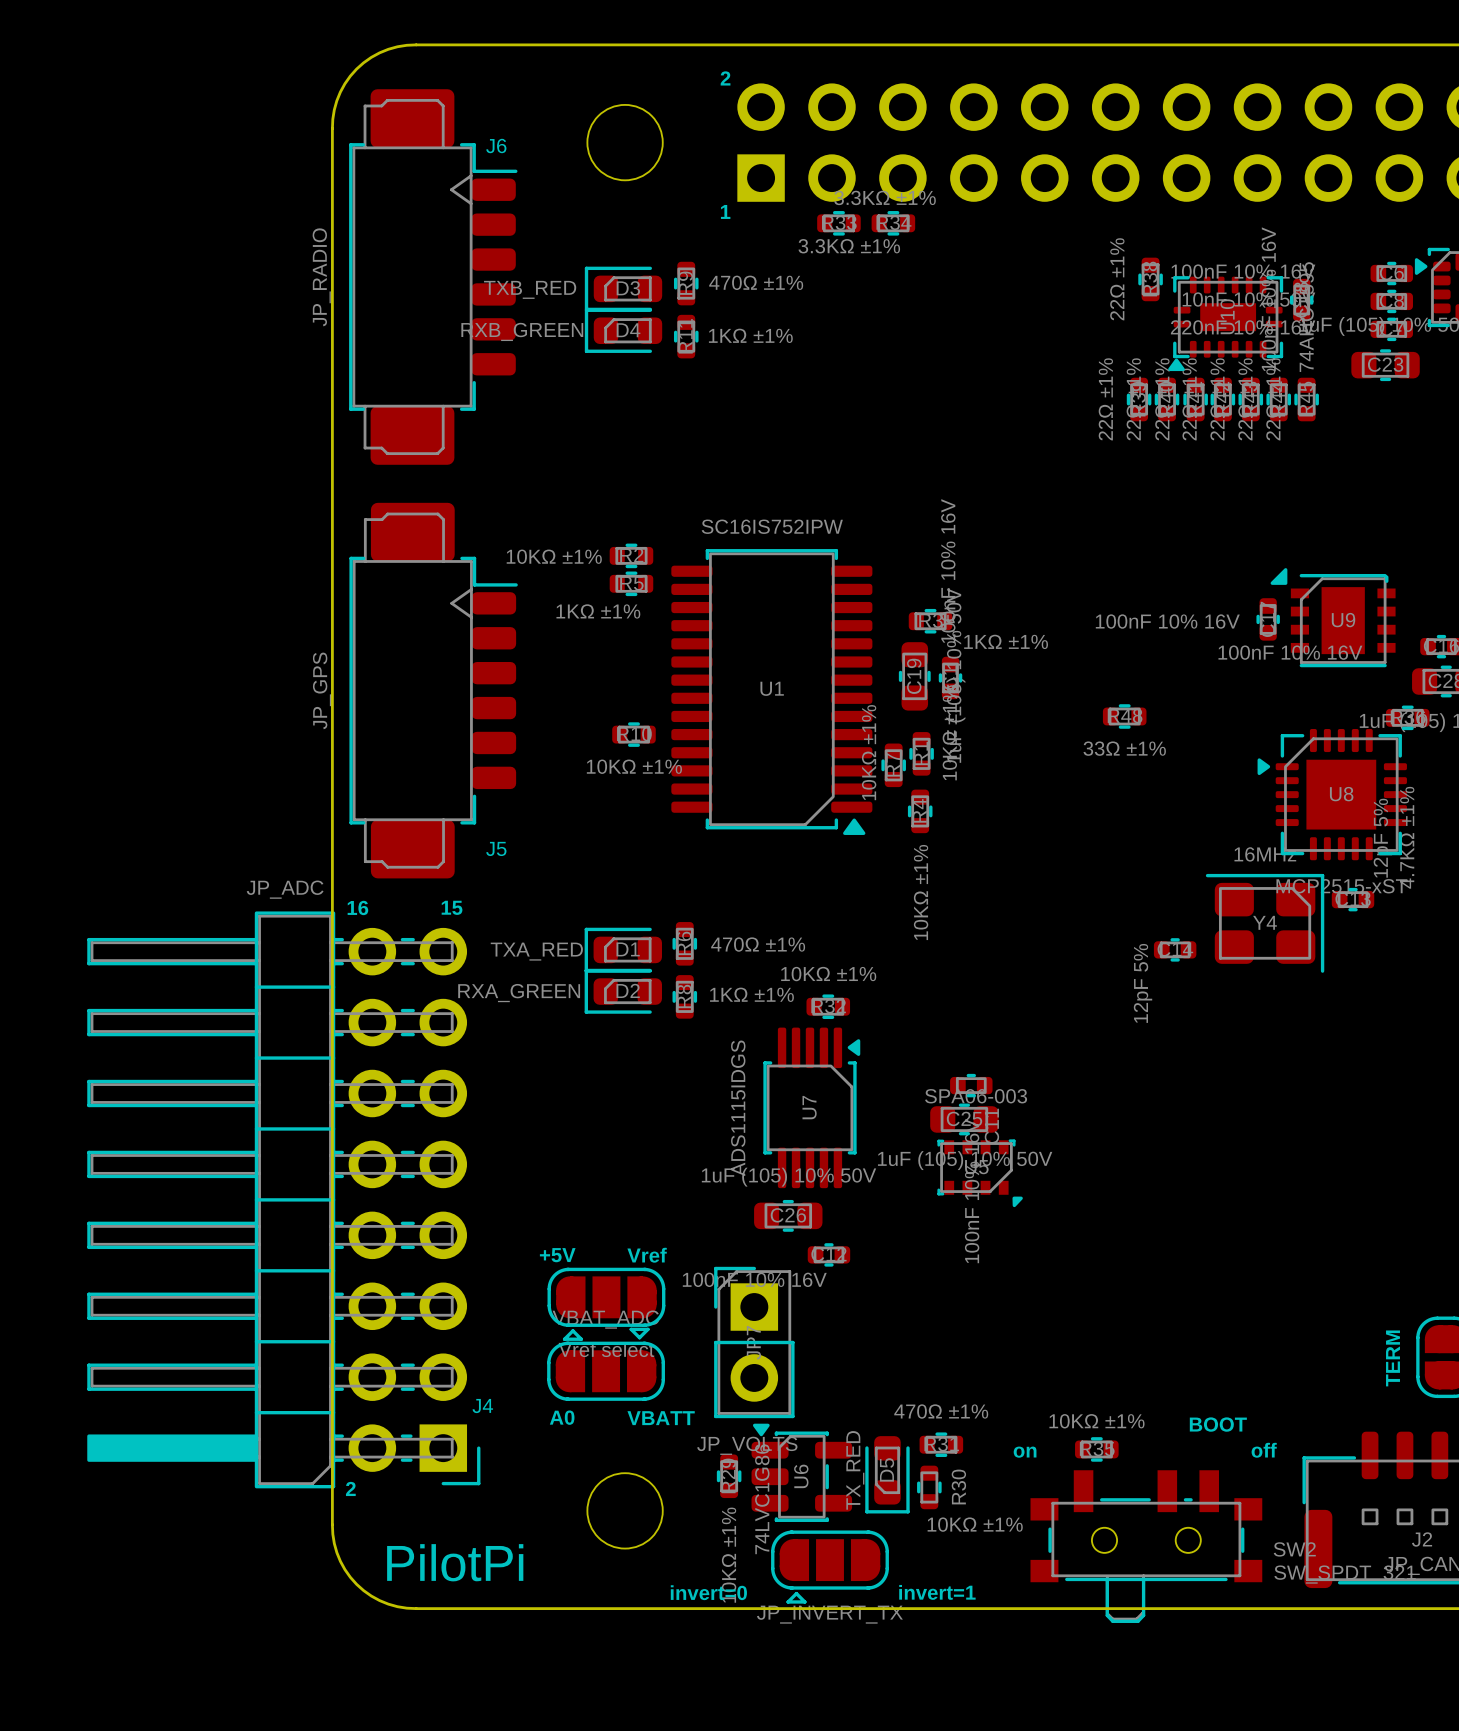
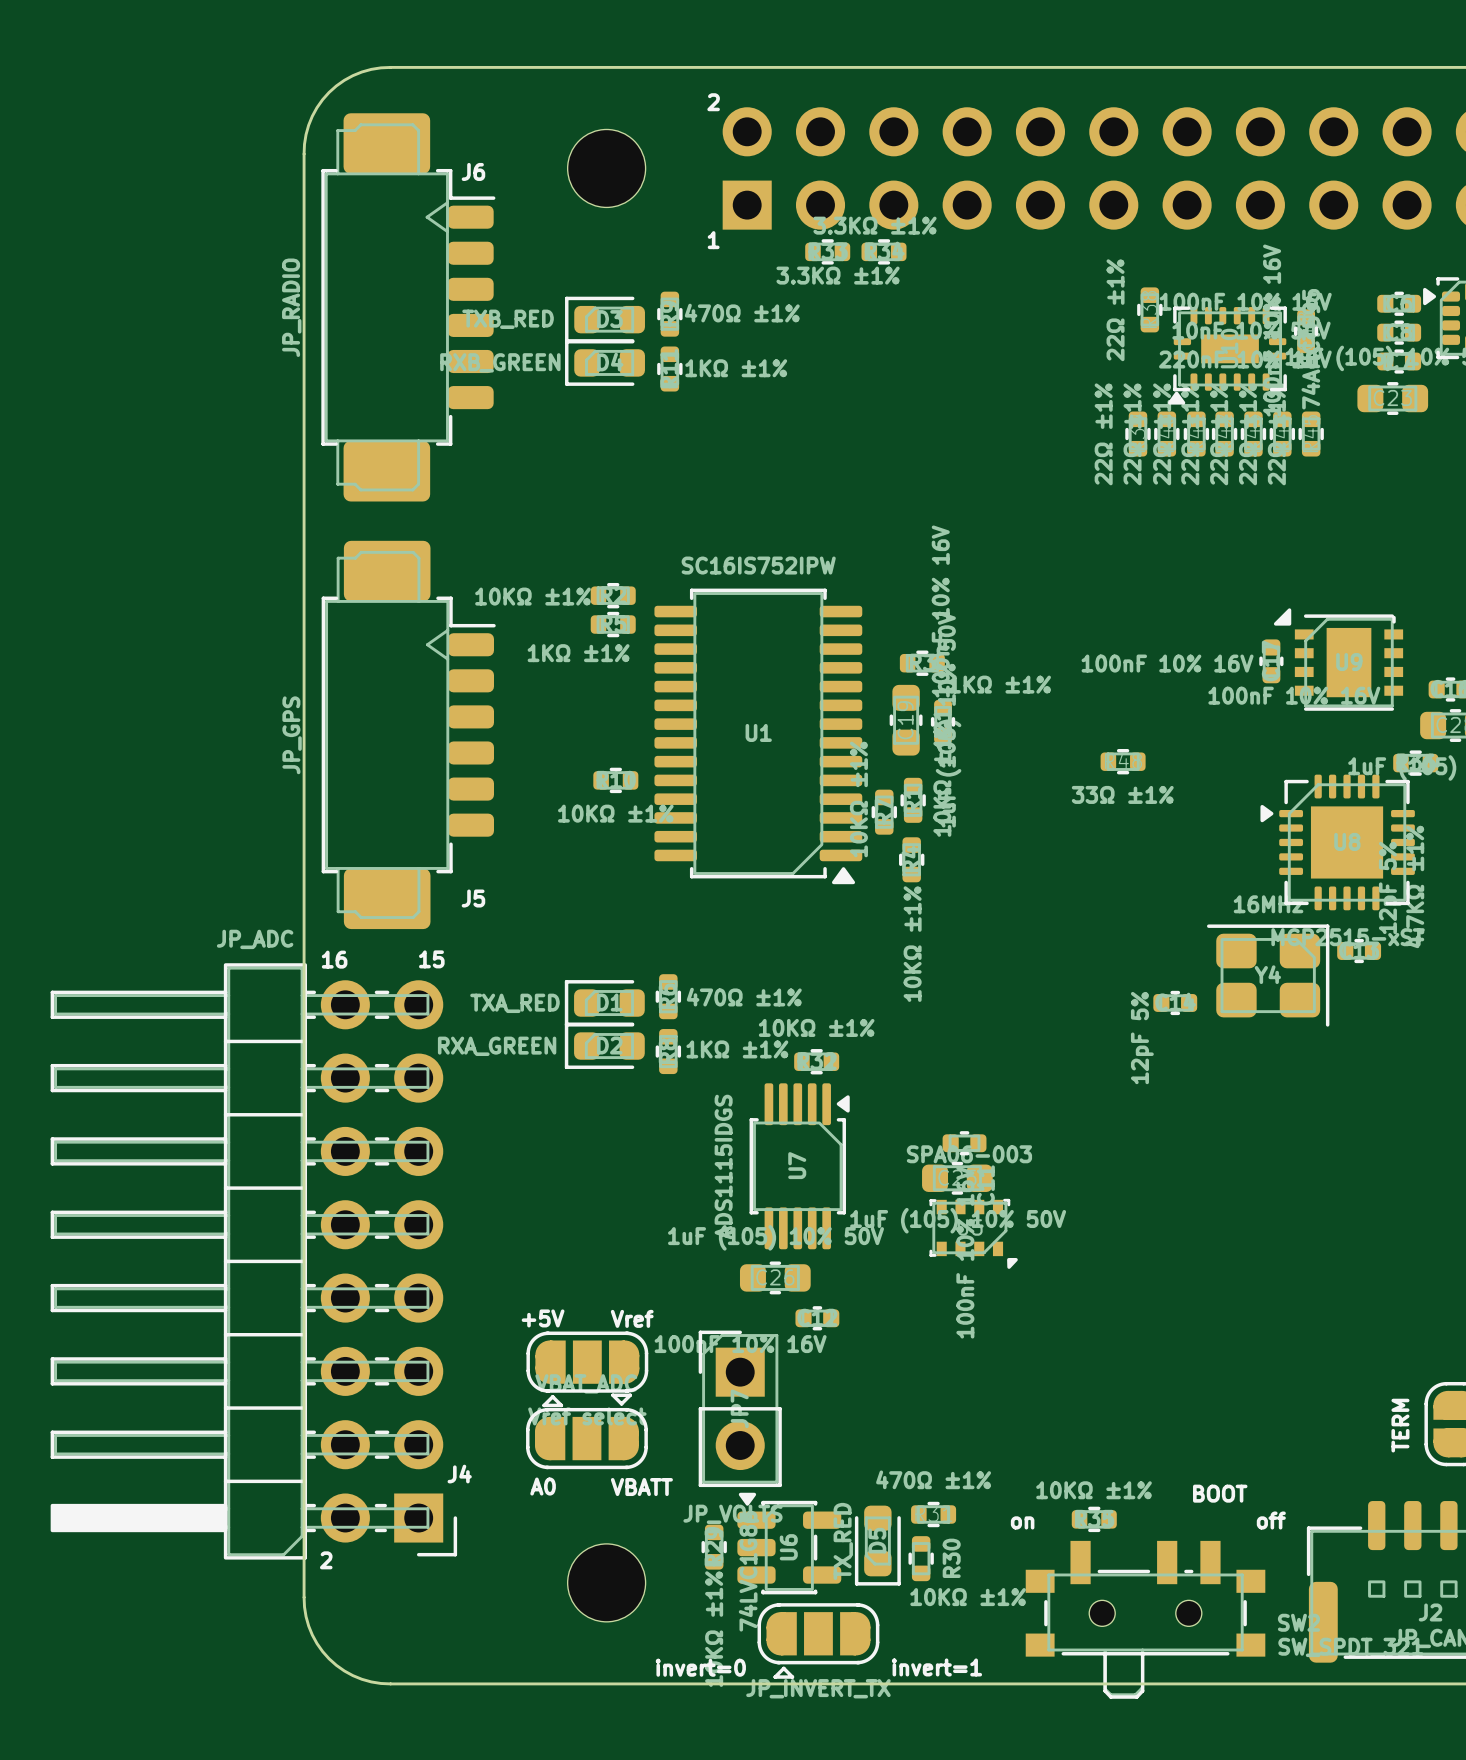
text: PilotPi (455, 1562) -> none

